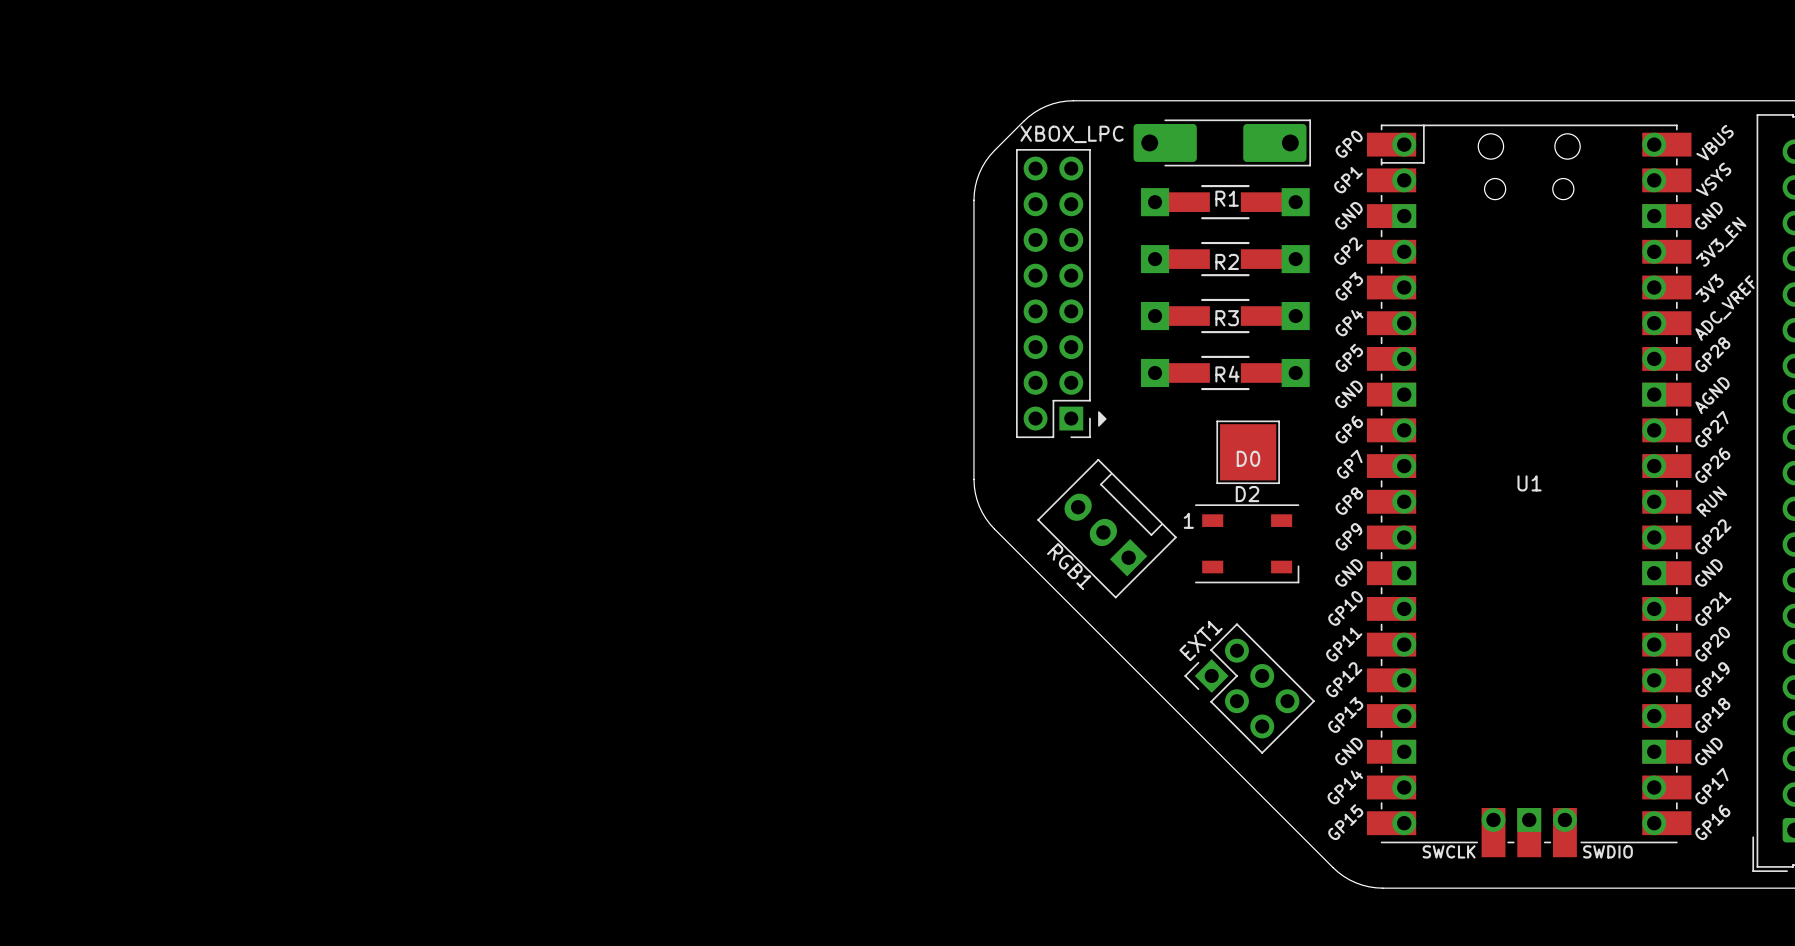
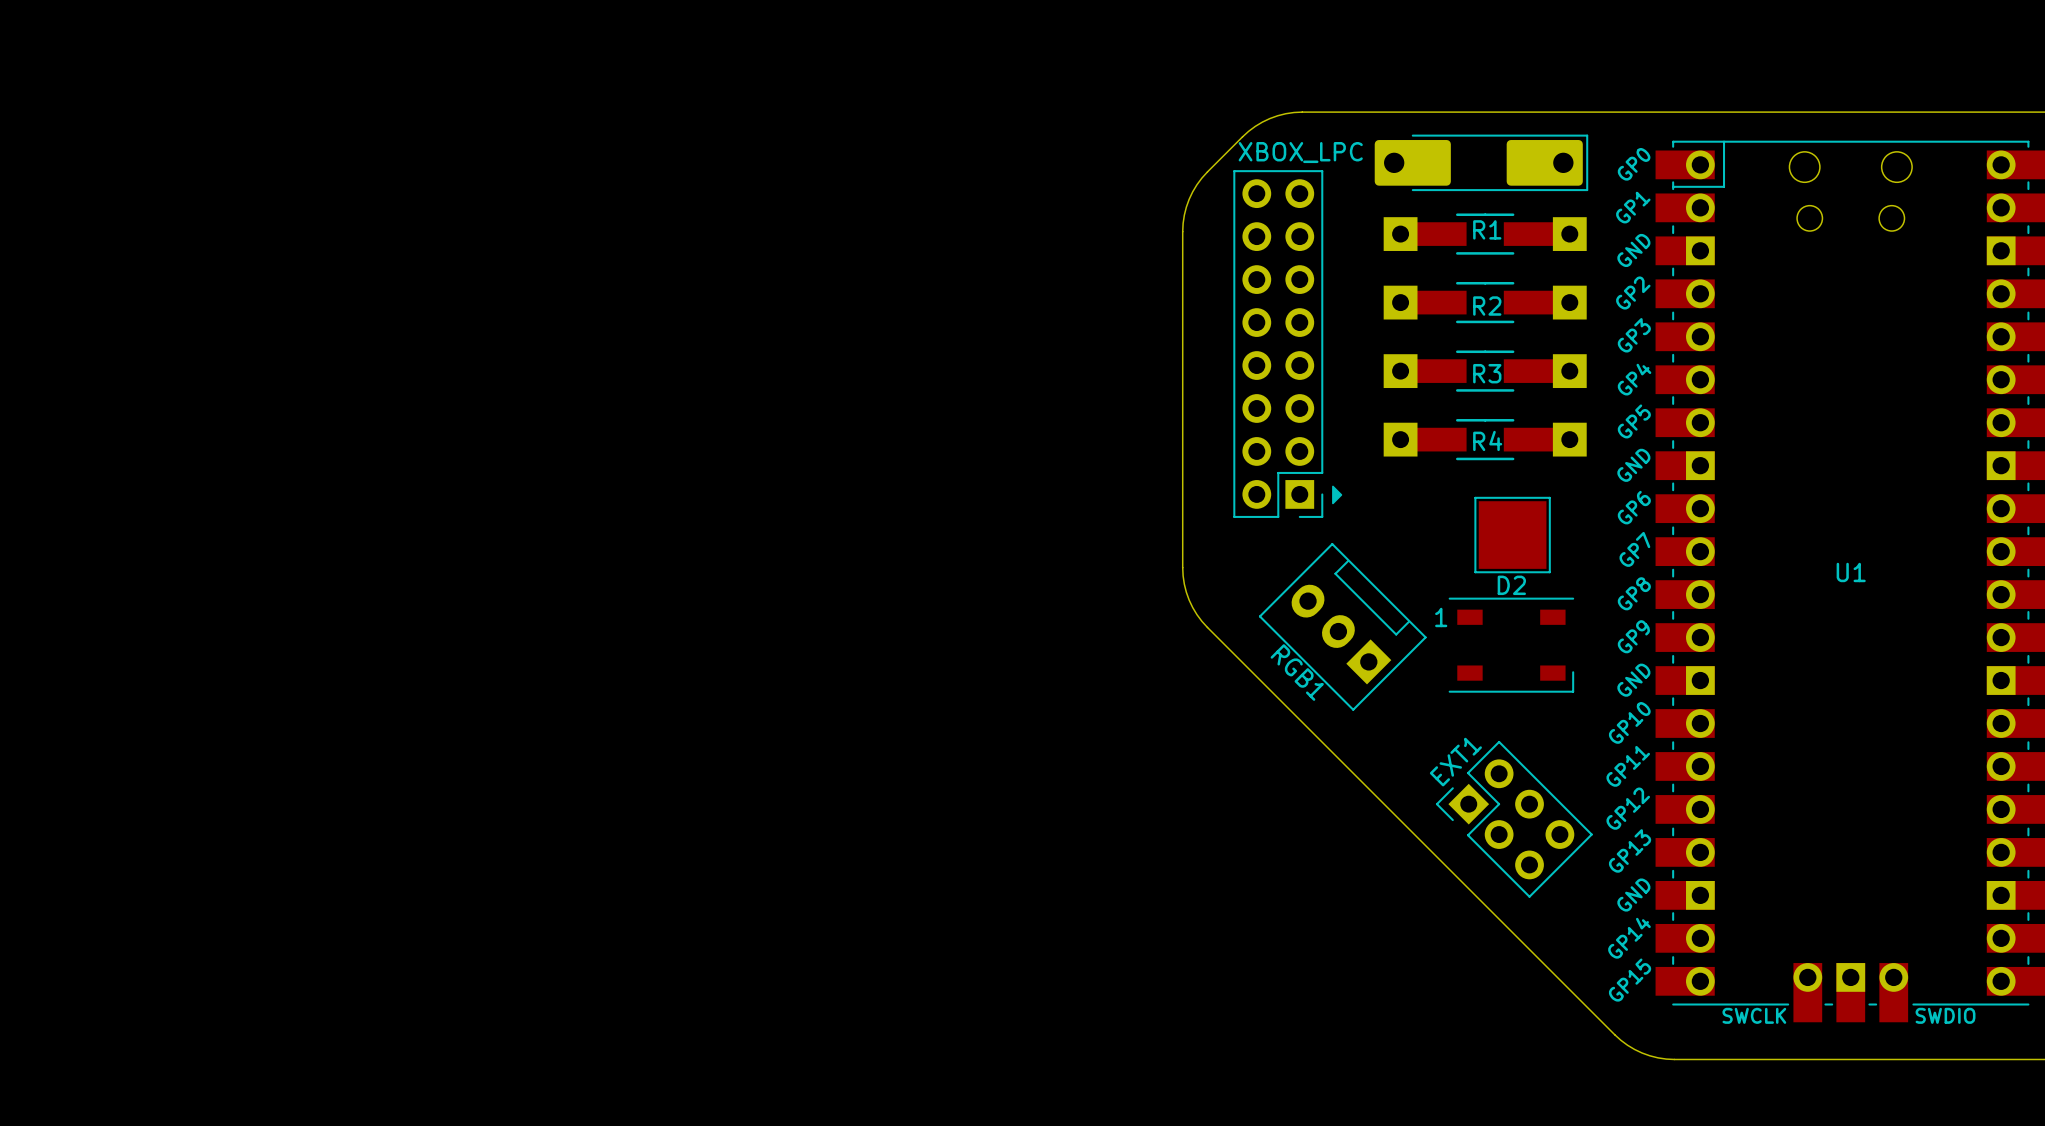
D0 name: D0 (1248, 458) -> none

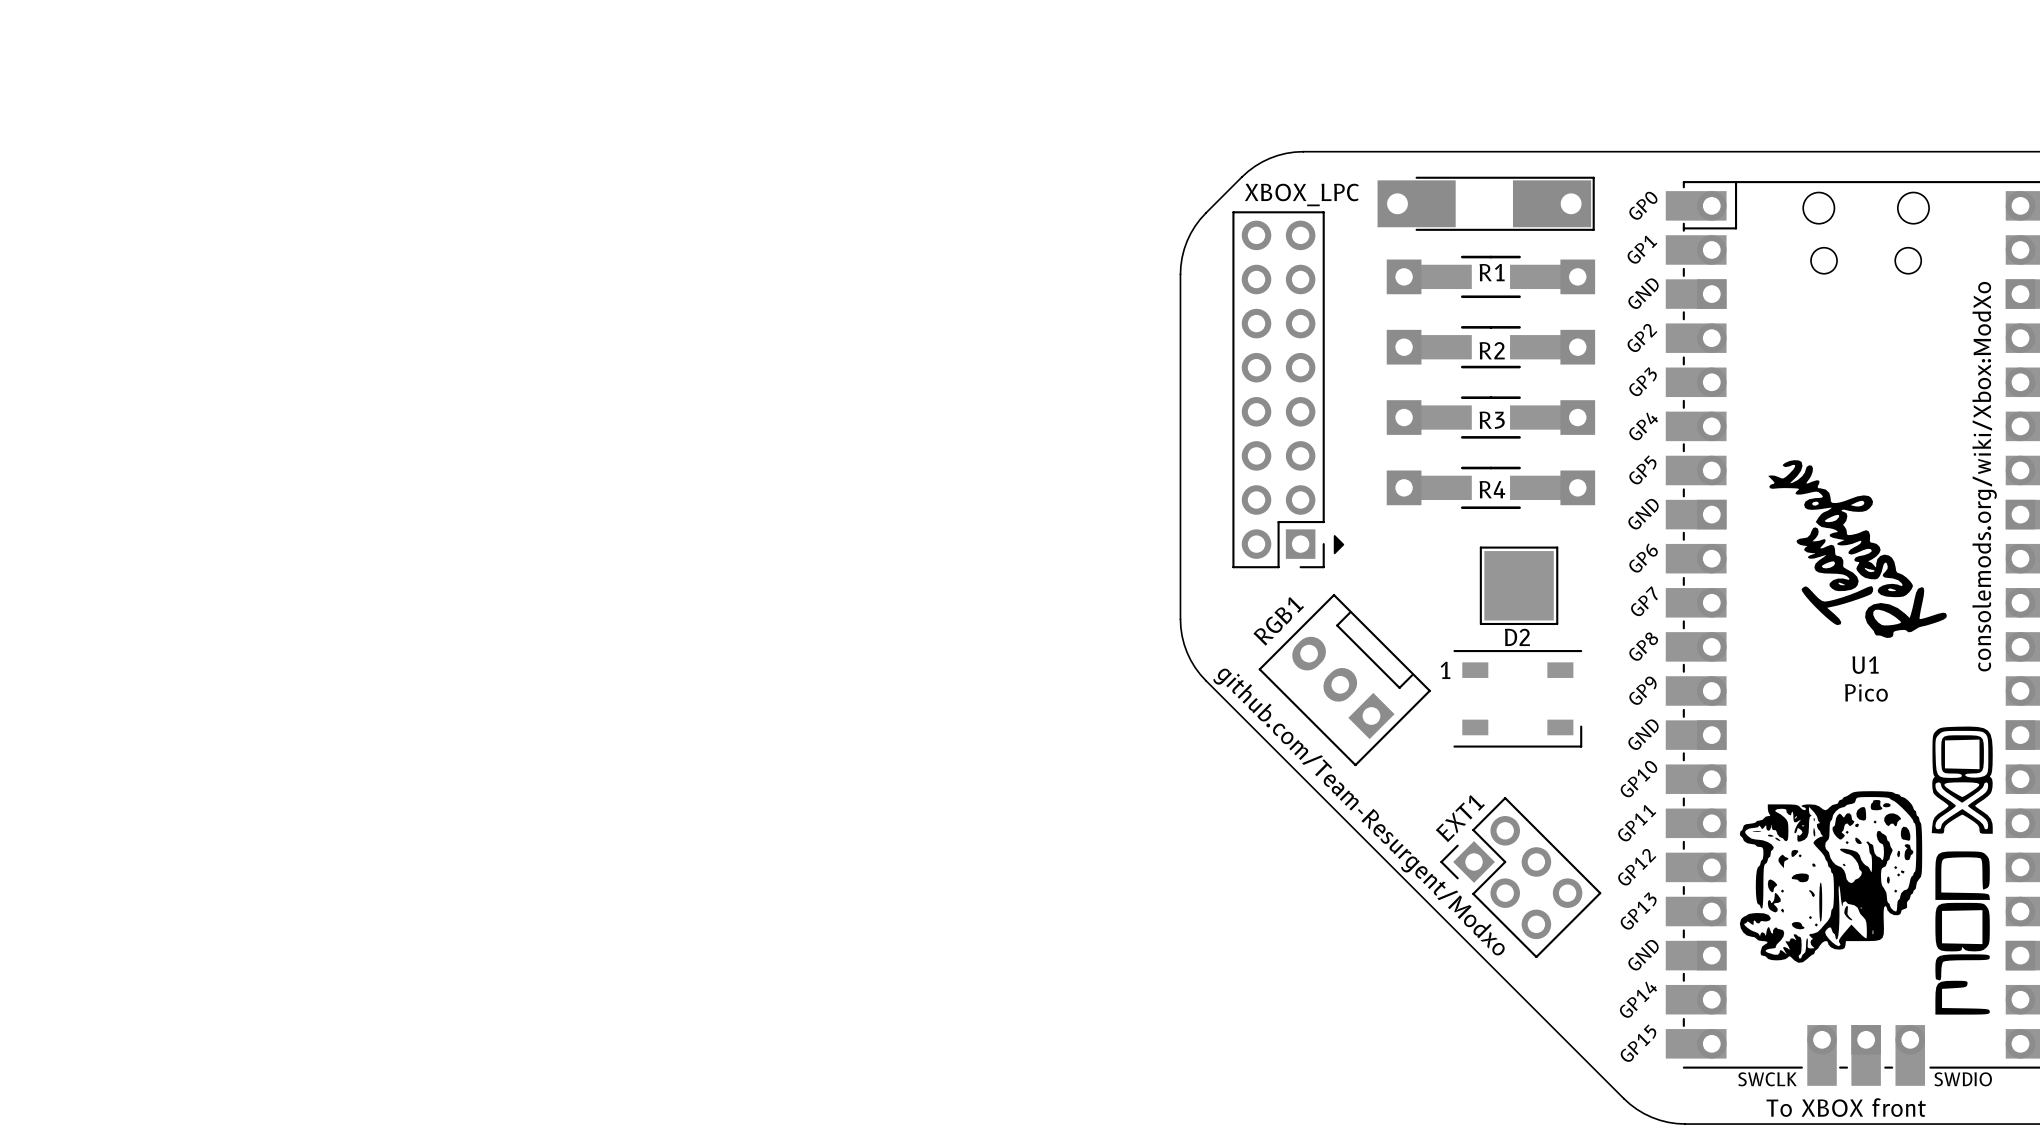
part footprint: [1374, 134, 1589, 192] -> [1377, 176, 1595, 231]
text: none -> consolemods.org/wiki/Xbox:ModXo (1984, 476)
drawing: none -> [1768, 460, 1947, 638]
U1 name position: U1 (1851, 572) -> U1 (1865, 665)
U1 value: none -> Pico (1866, 692)
RGB1 name rotation: 0° (1297, 672) -> 90° counterclockwise (1278, 621)
RGB1 name position: RGB1 (1297, 672) -> RGB1 (1278, 621)
drawing: none -> [1739, 726, 1993, 1015]
text: none -> github.com/Team-Resurgent/Modxo (1359, 812)
text: none -> To XBOX front (1846, 1107)

